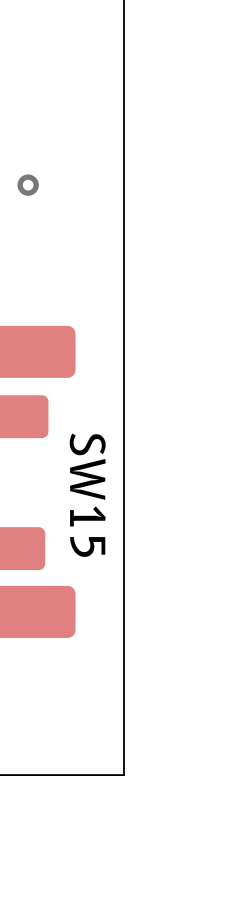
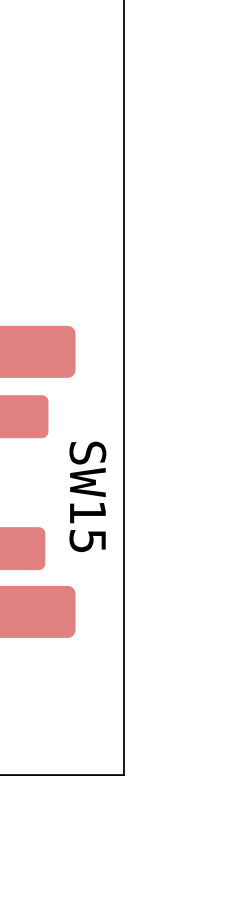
via: (28, 185) -> none

